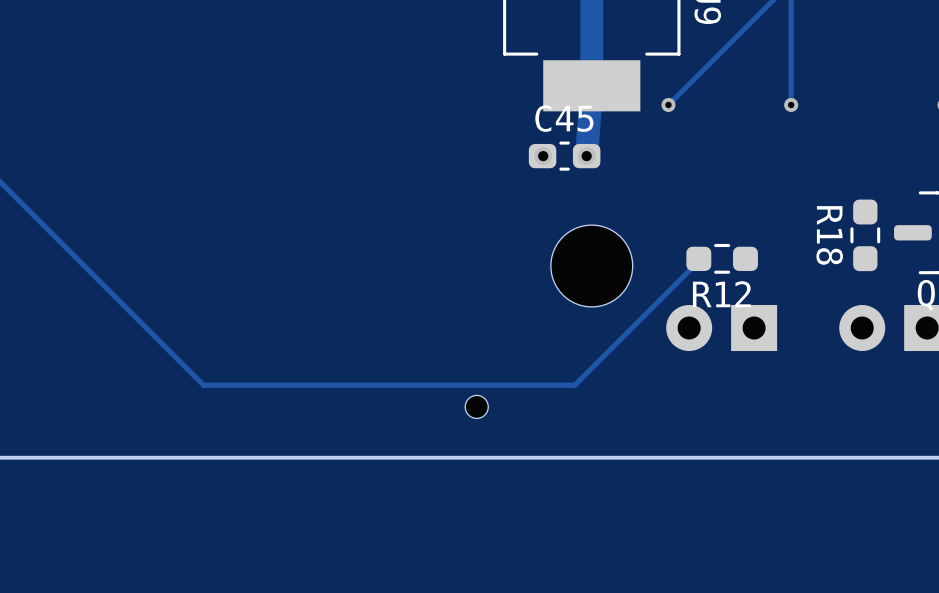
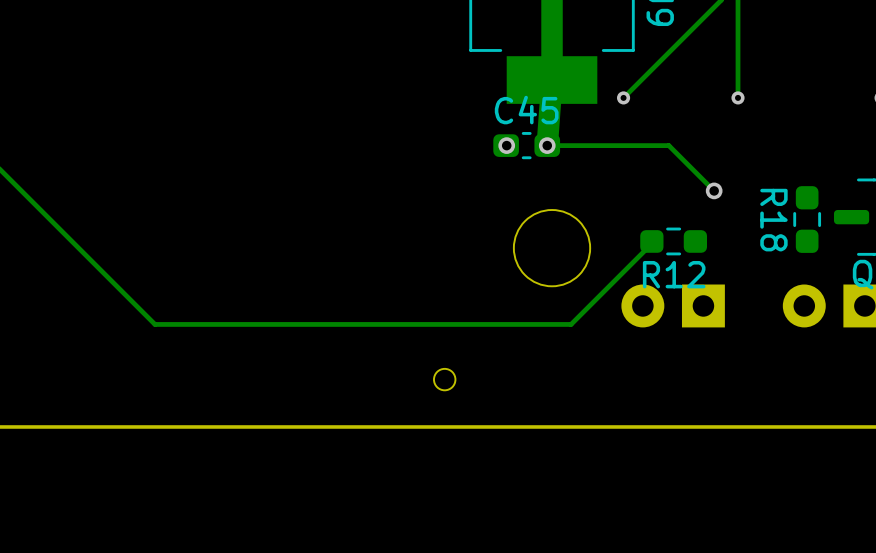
track: none -> (547, 145) (668, 145) (714, 190)
via: none -> (714, 190)
track: (612, 347) (574, 385) (203, 385) (166, 347) -> (571, 324) (155, 324)

